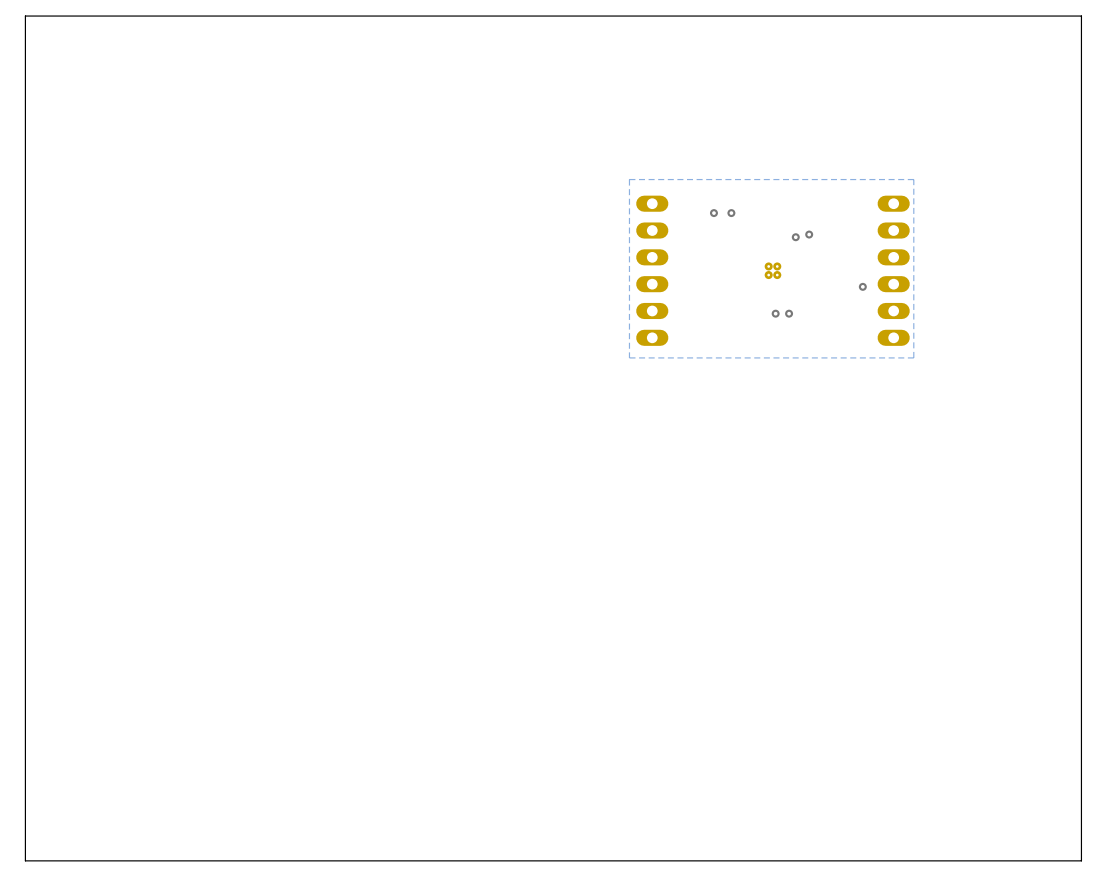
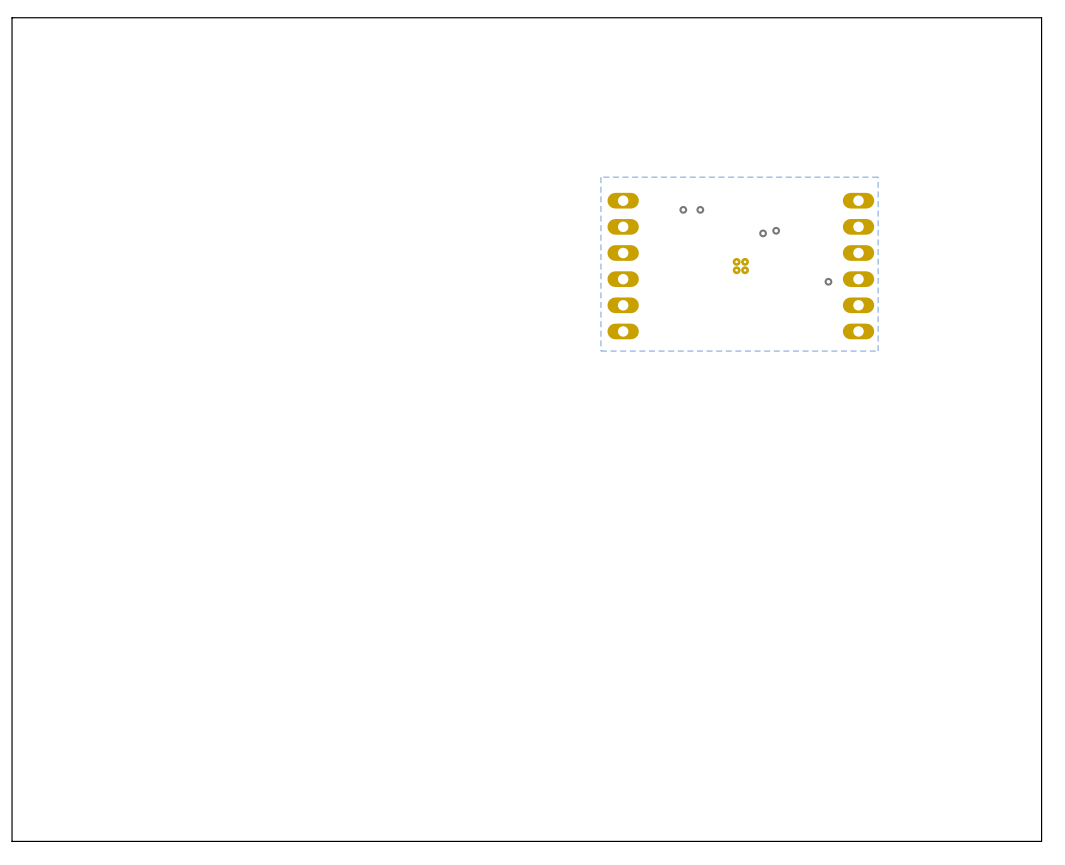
via: (775, 313) -> none
via: (789, 313) -> none

